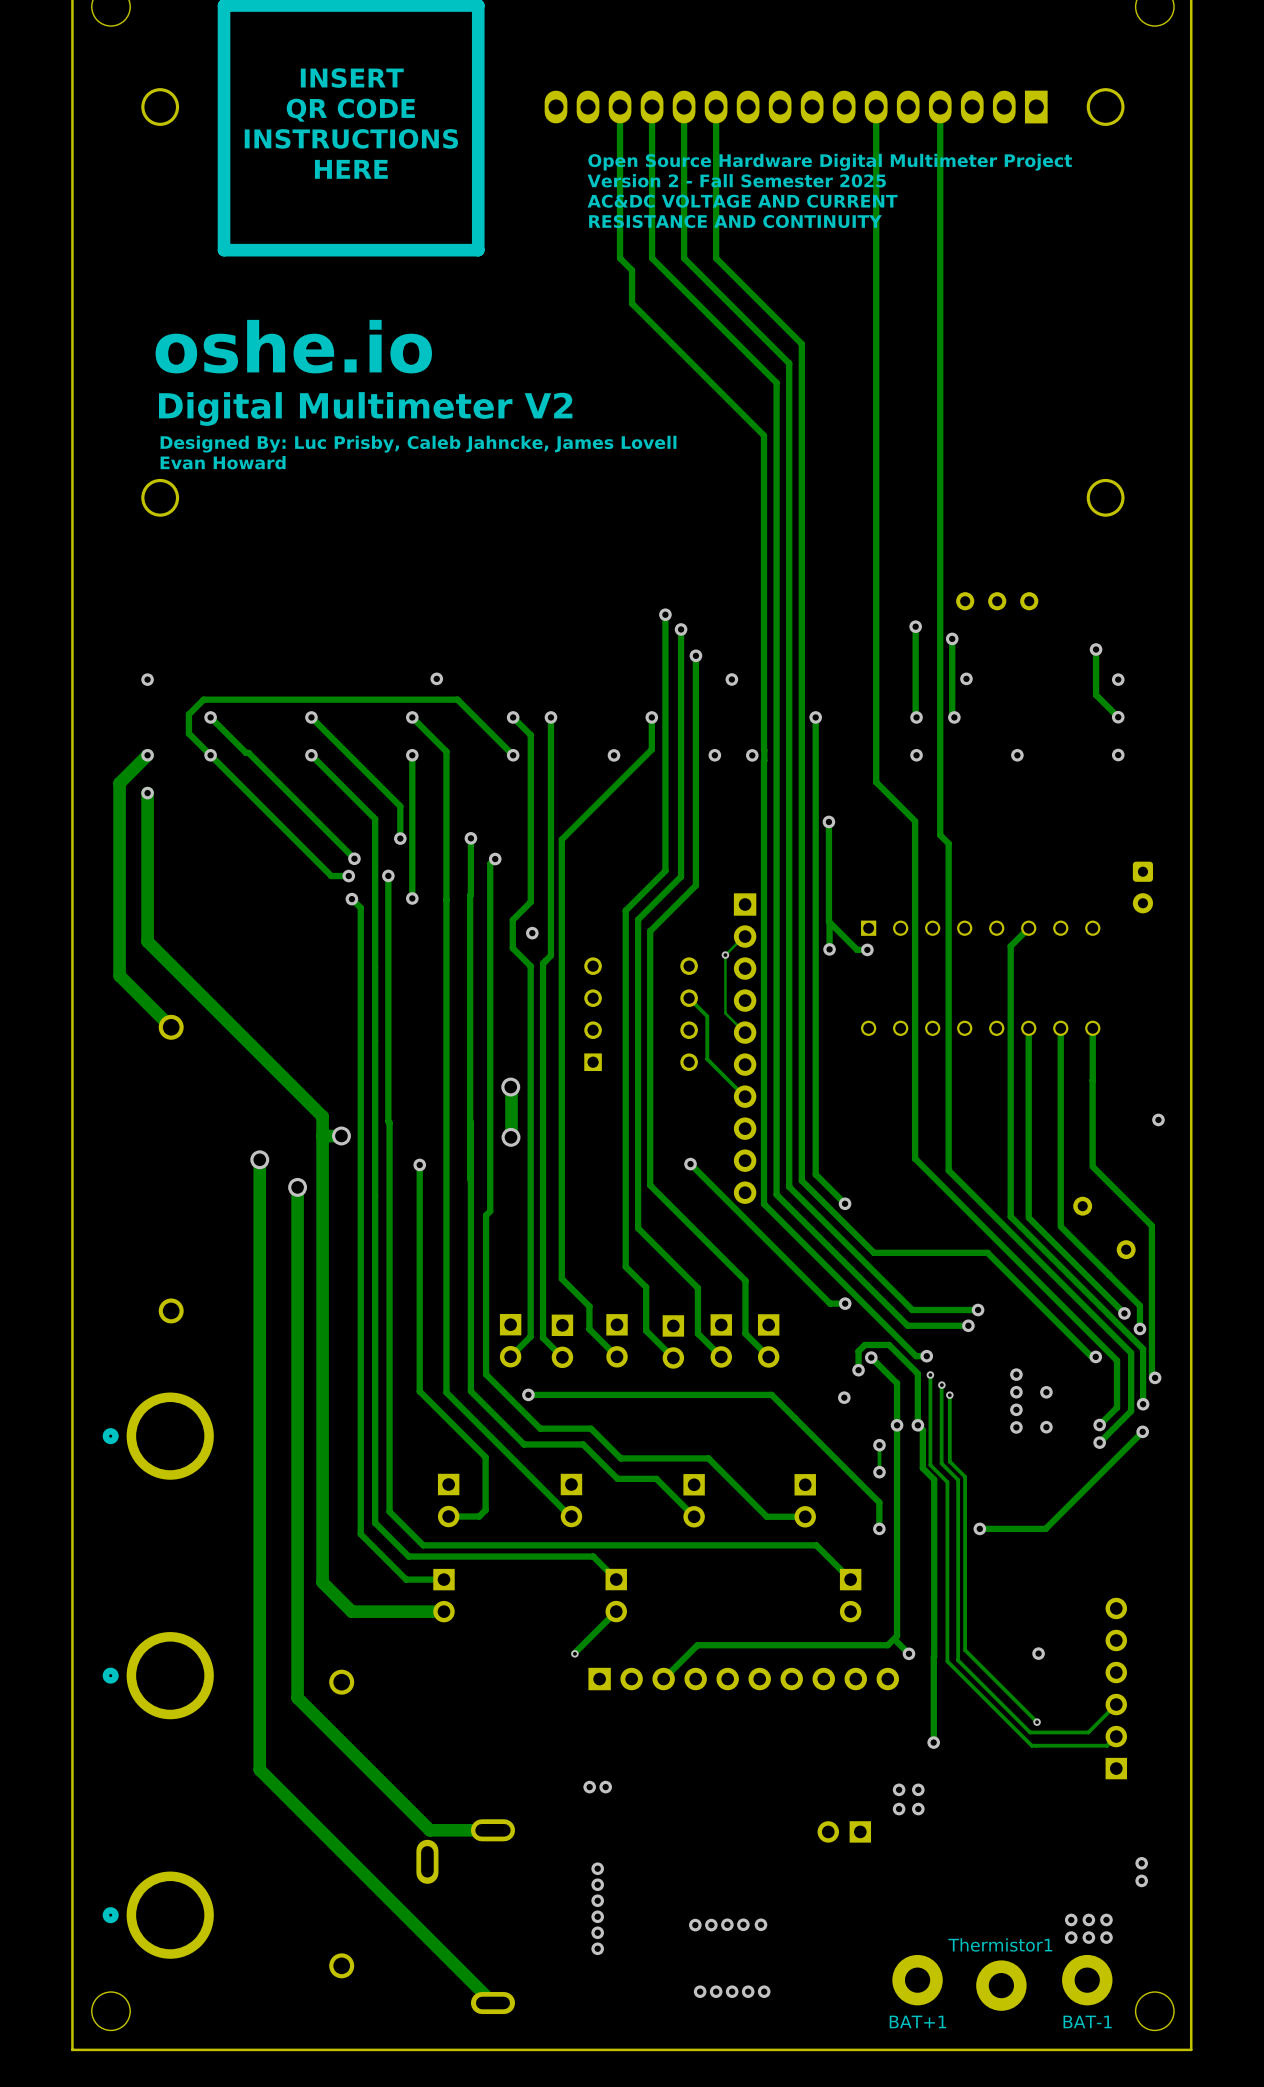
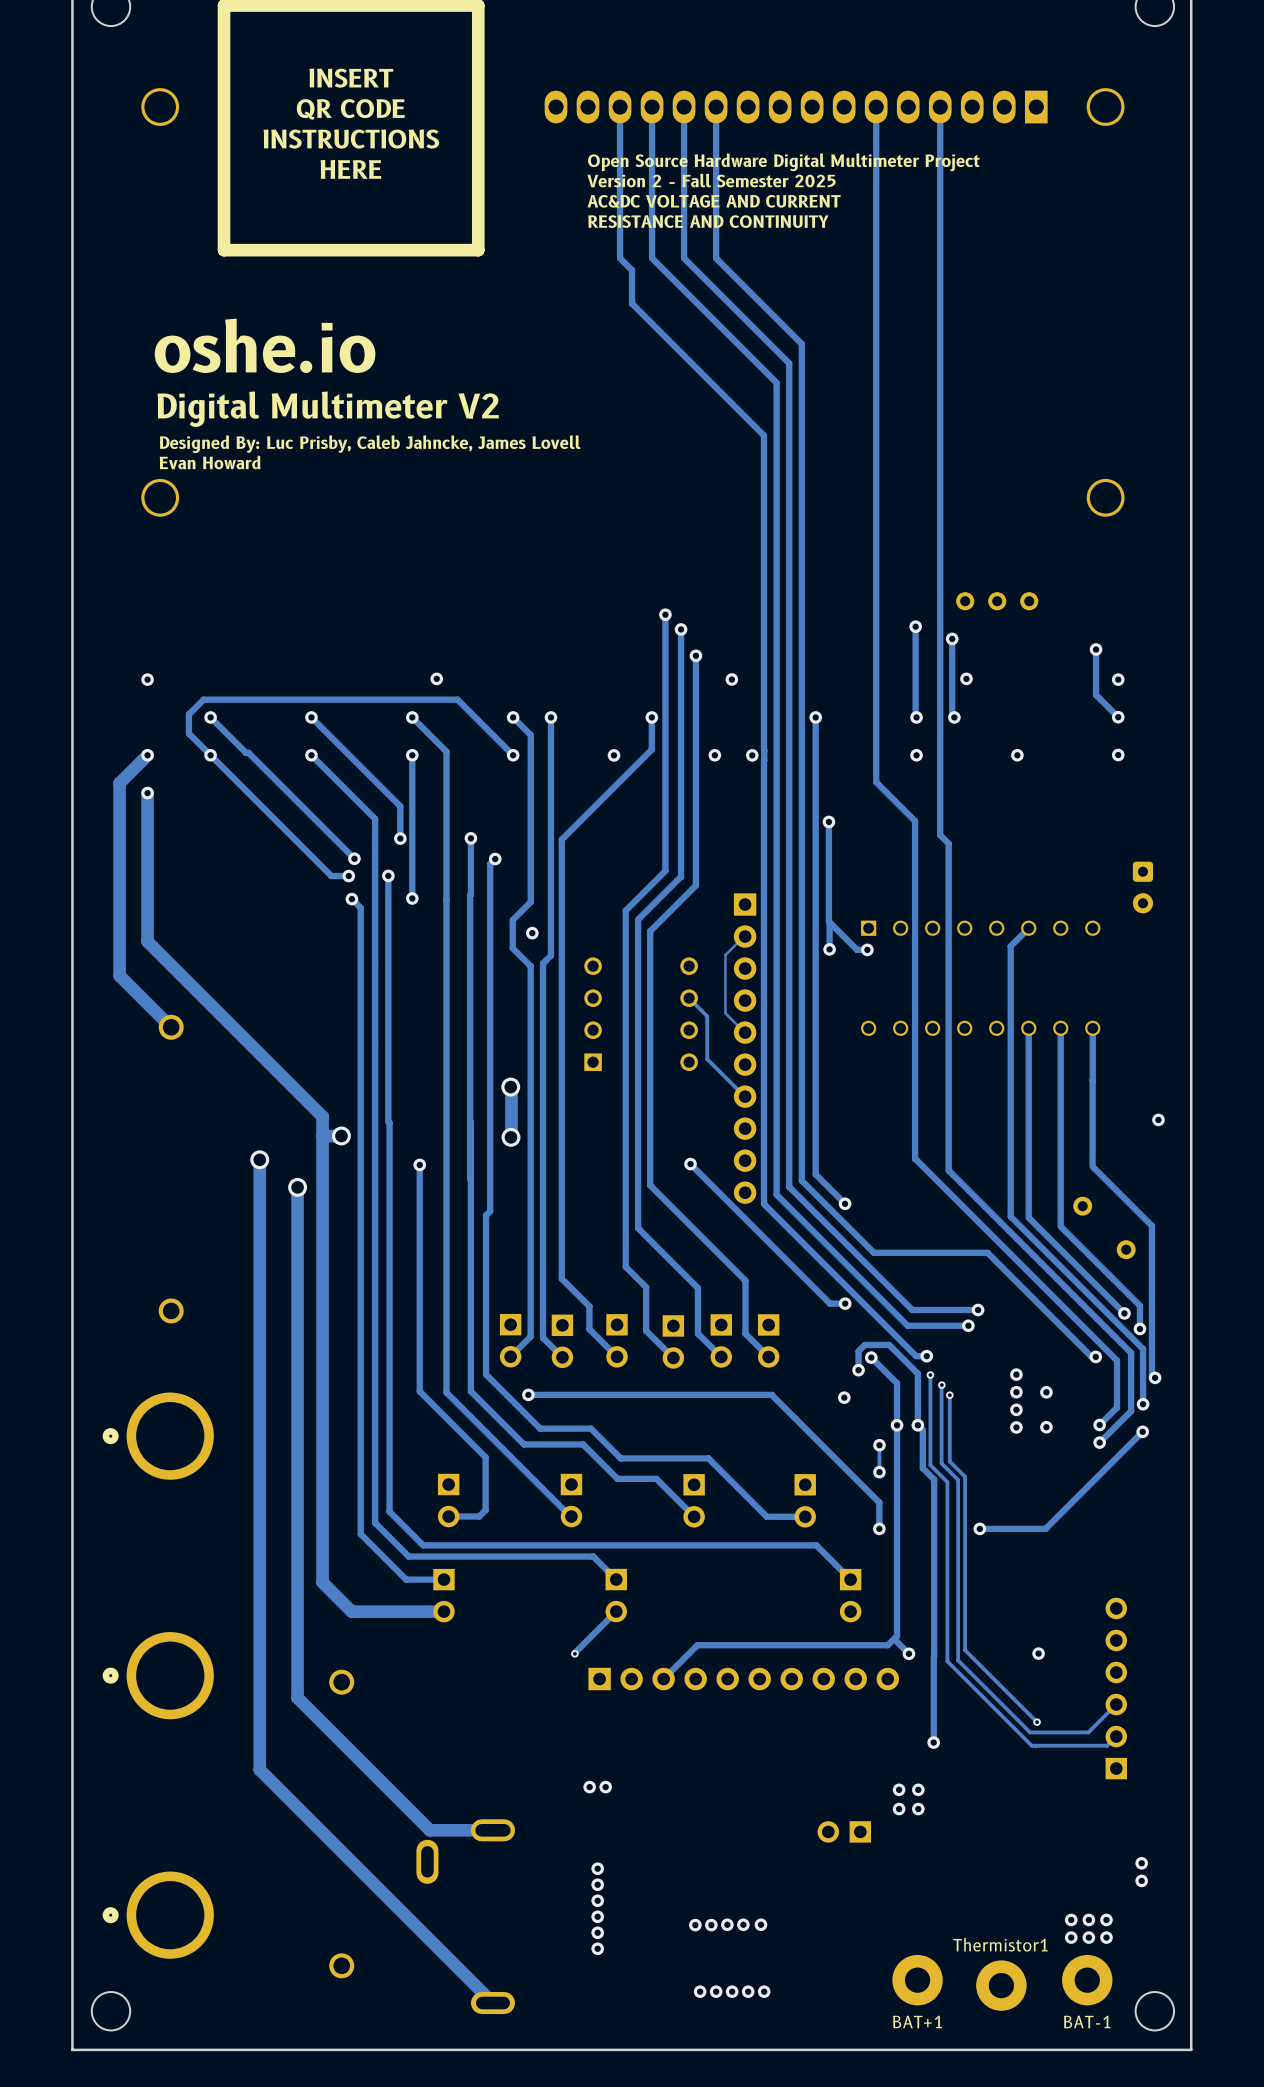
via: (725, 955) -> none

